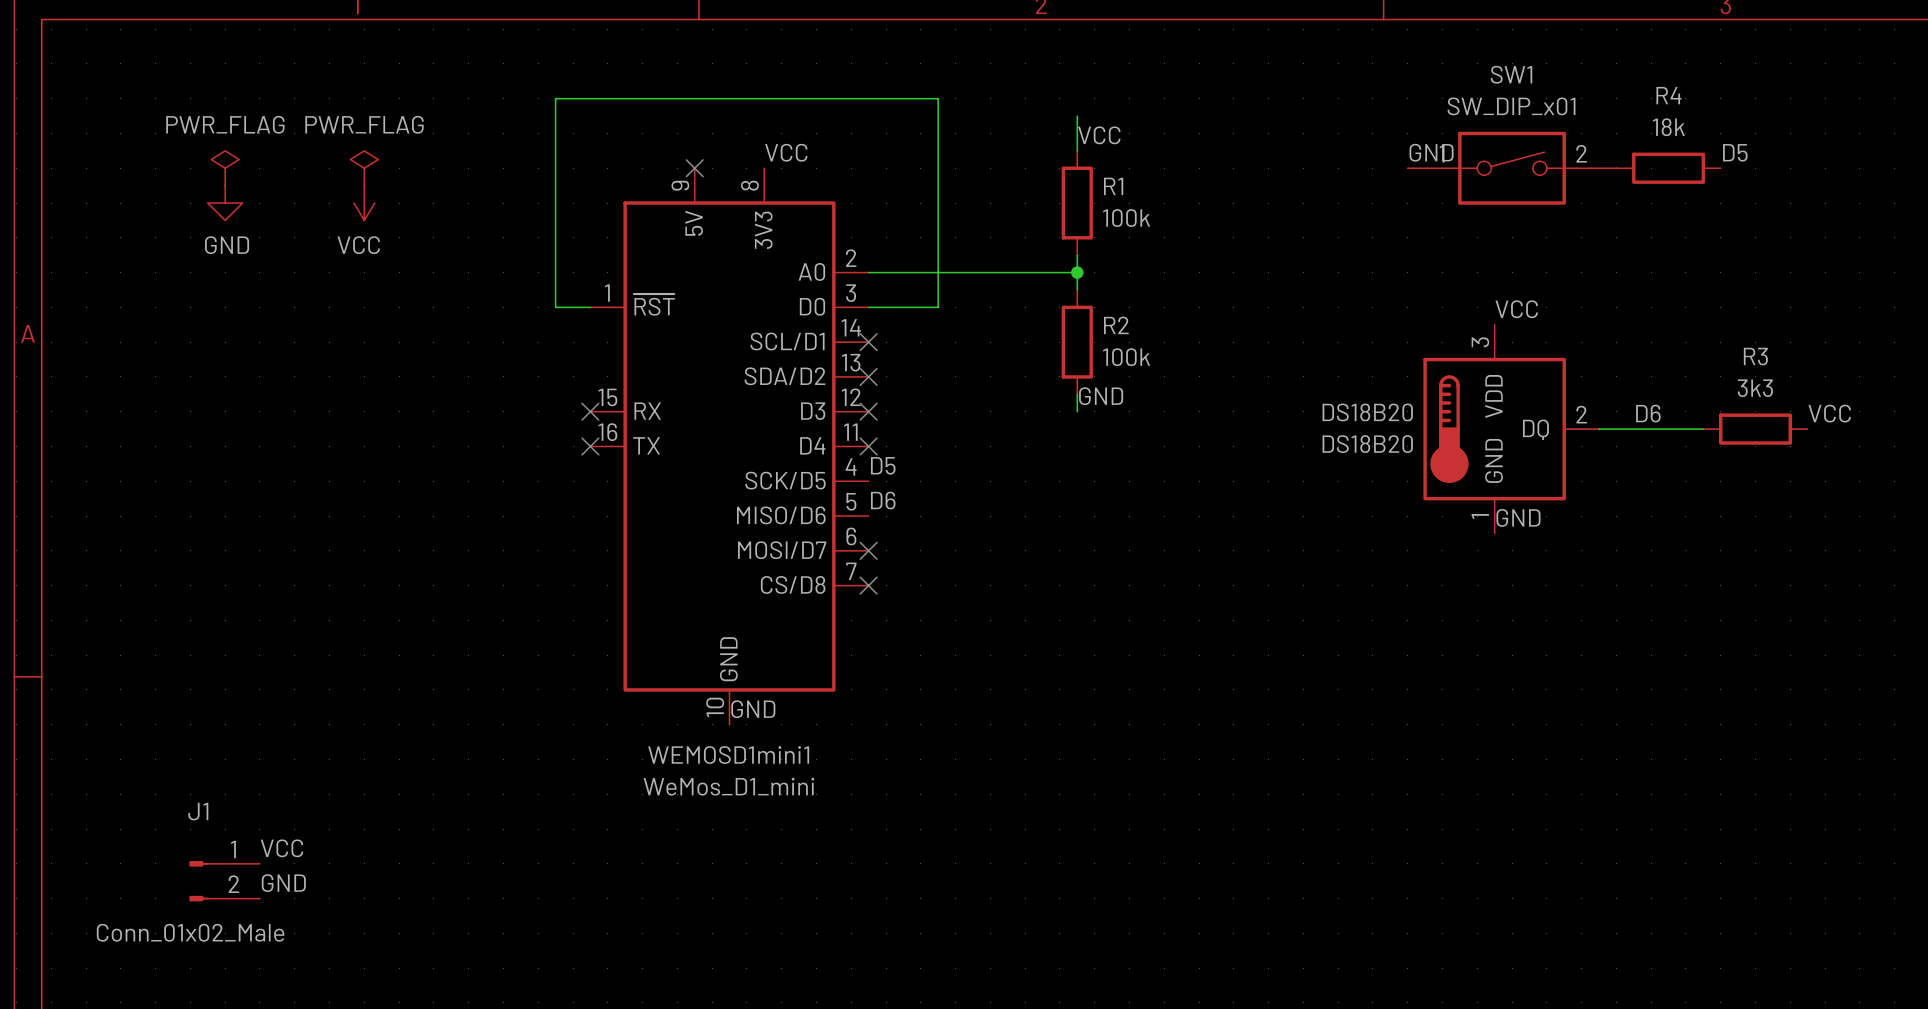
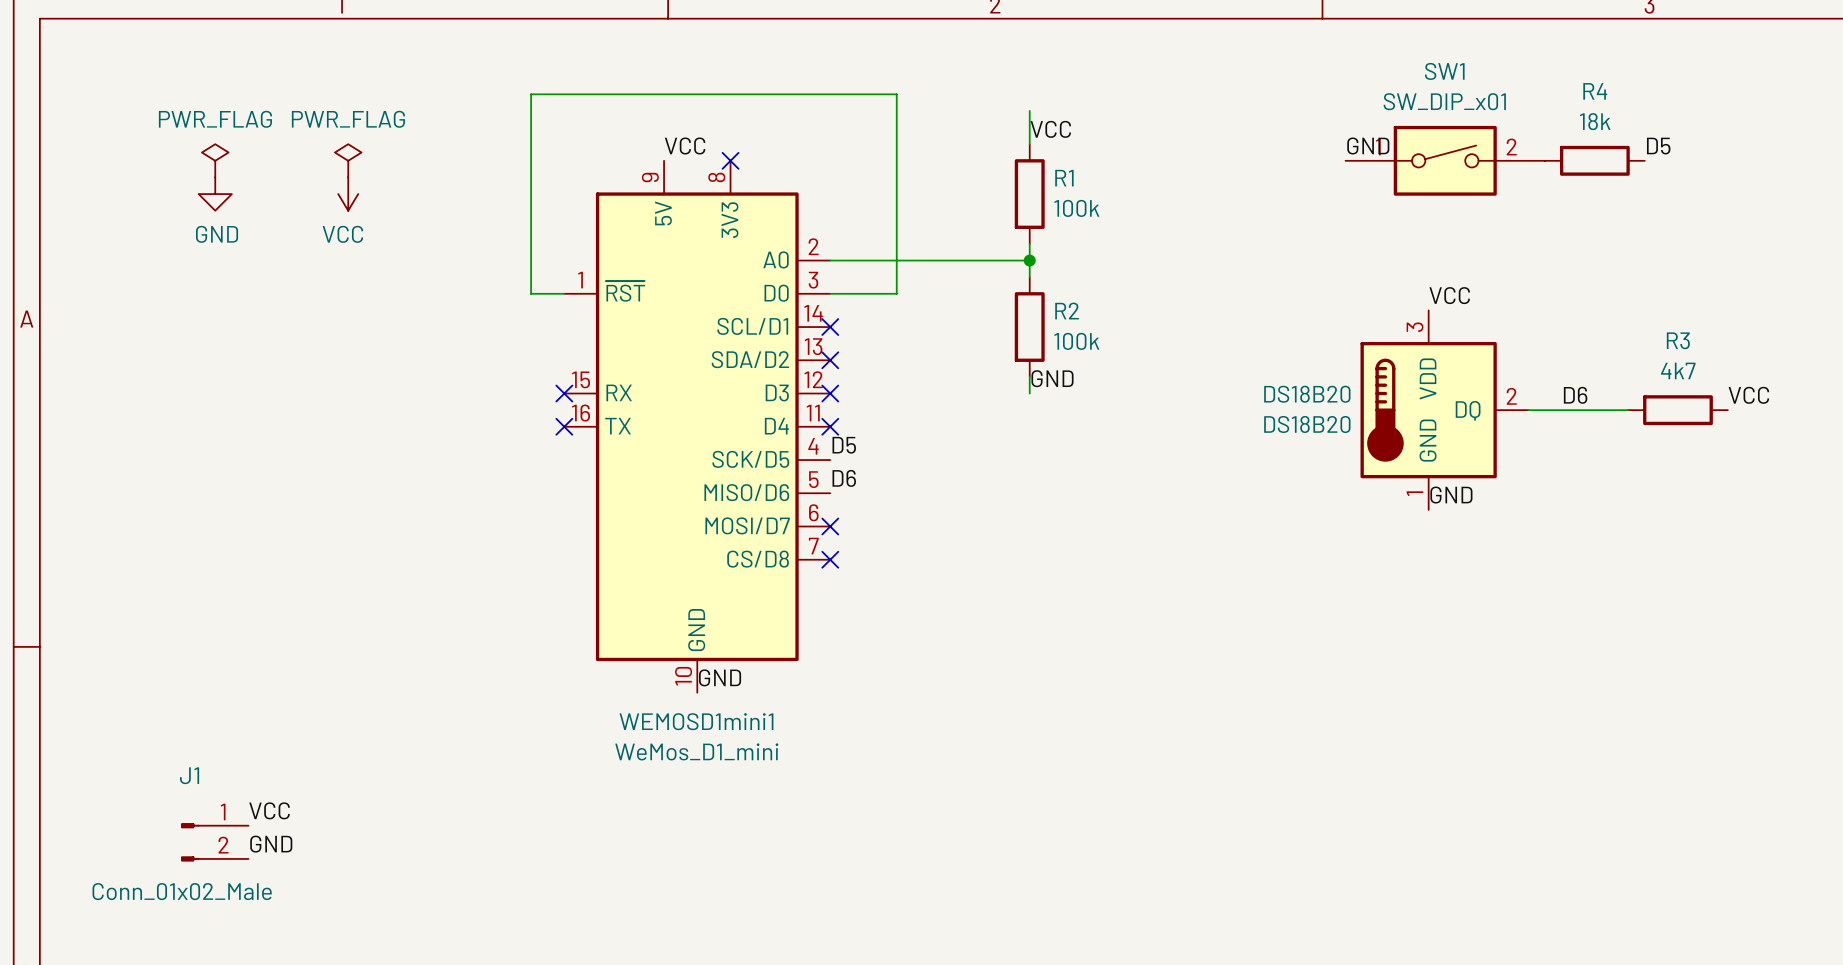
label position: VCC (786, 152) -> VCC (685, 146)
no-connect mark position: (694, 168) -> (730, 160)
R3 value: 3k3 (1755, 388) -> 4k7 (1678, 370)

